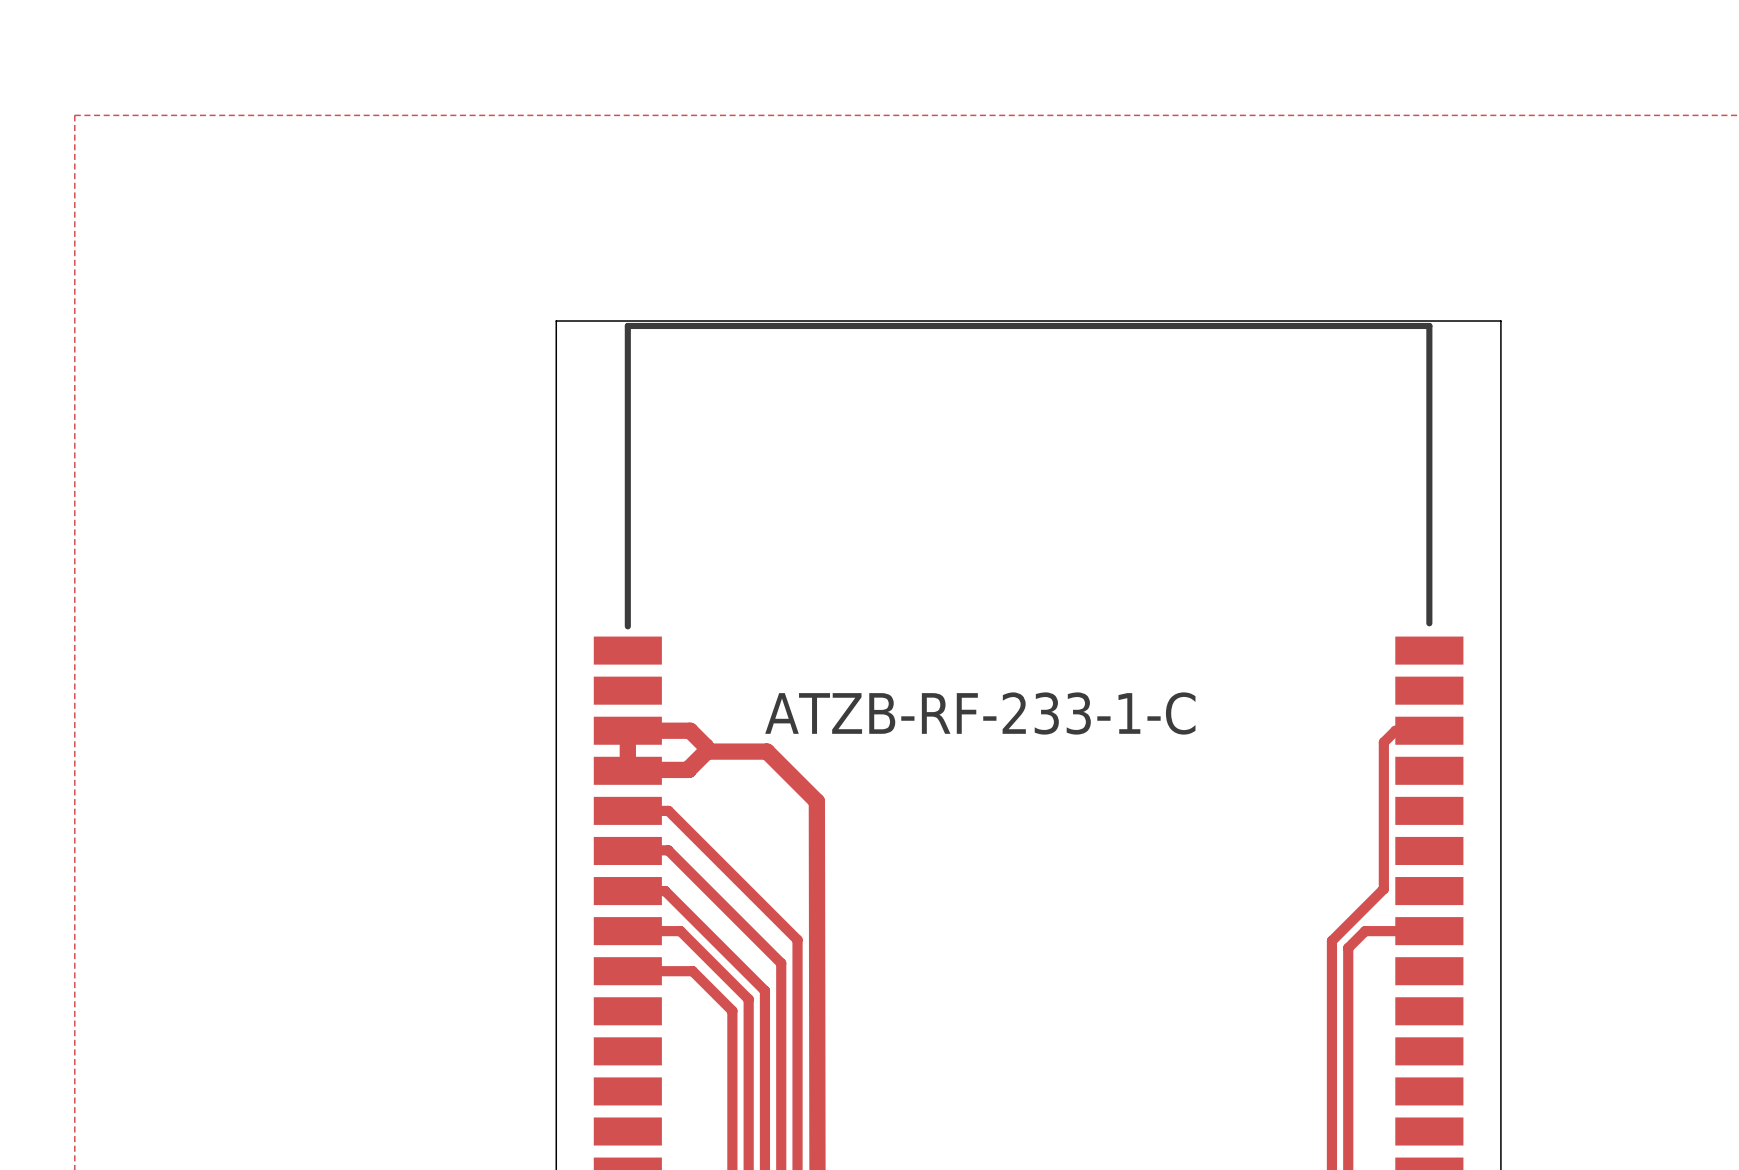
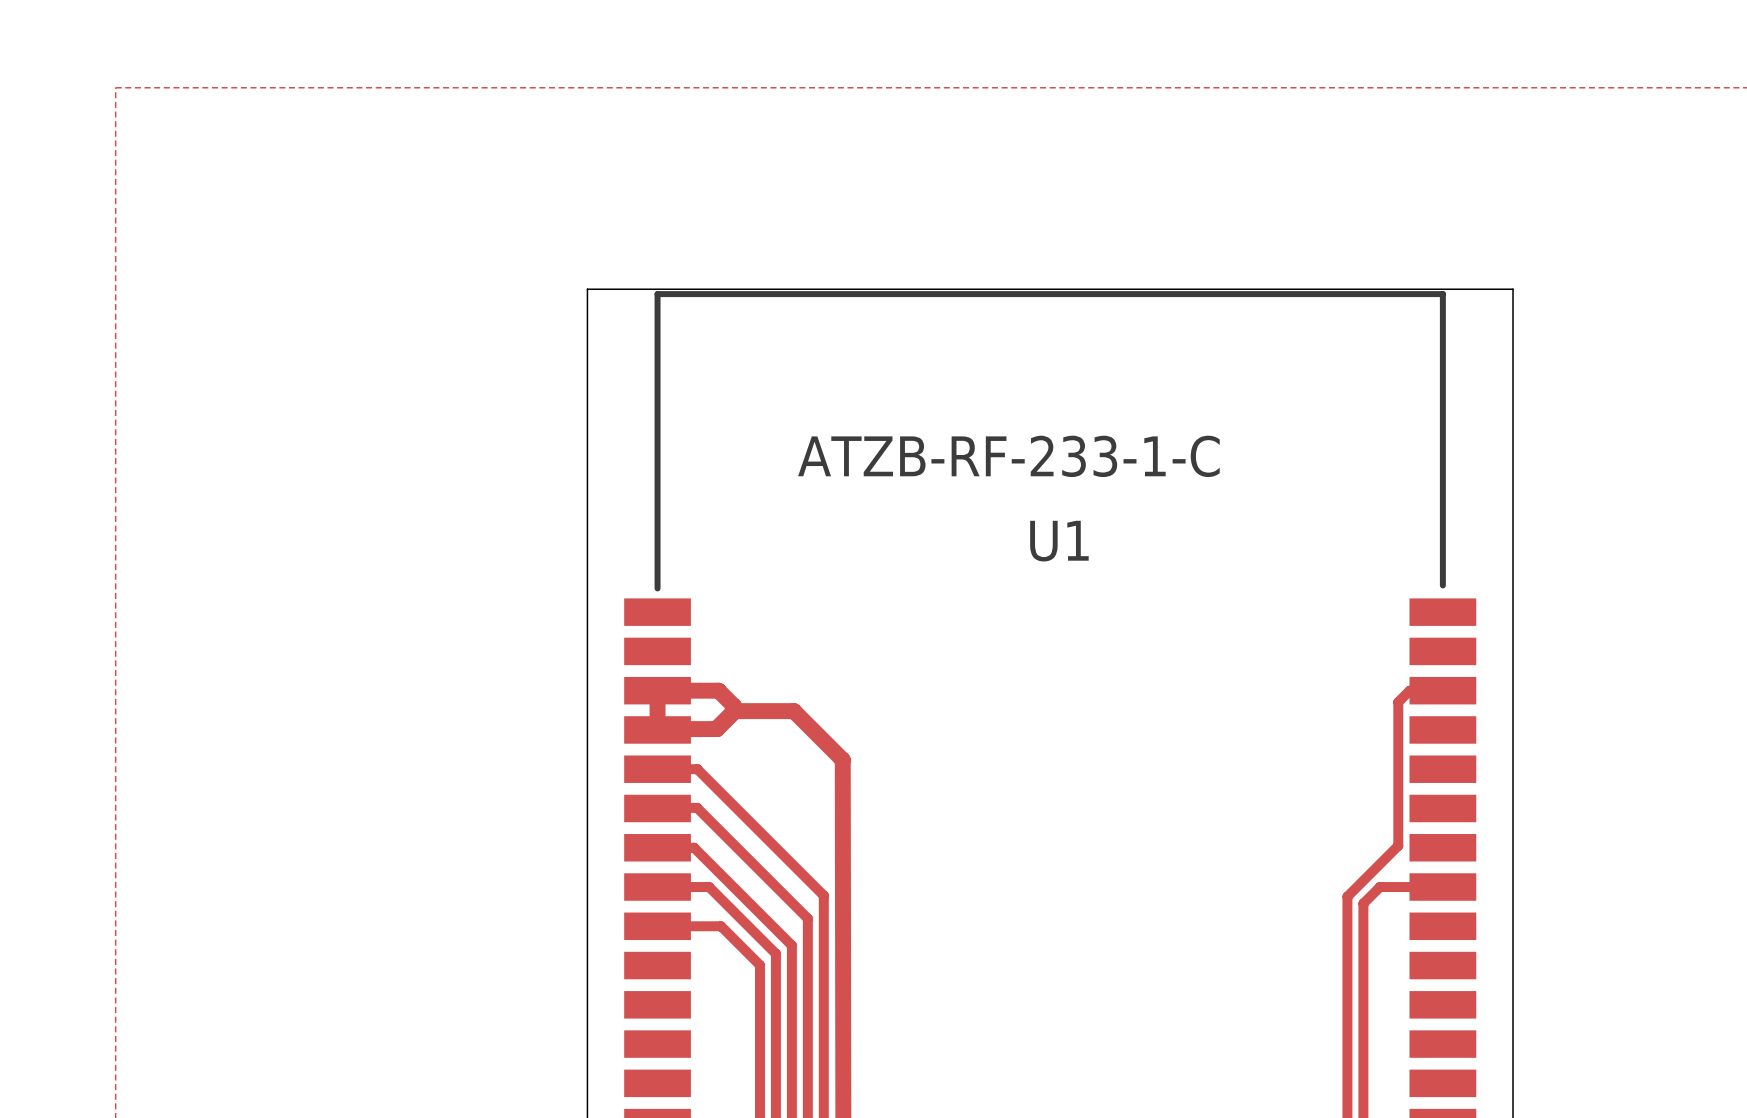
U1 name: none -> U1 (1059, 541)
U1 value position: ATZB-RF-233-1-C (980, 713) -> ATZB-RF-233-1-C (1008, 456)

